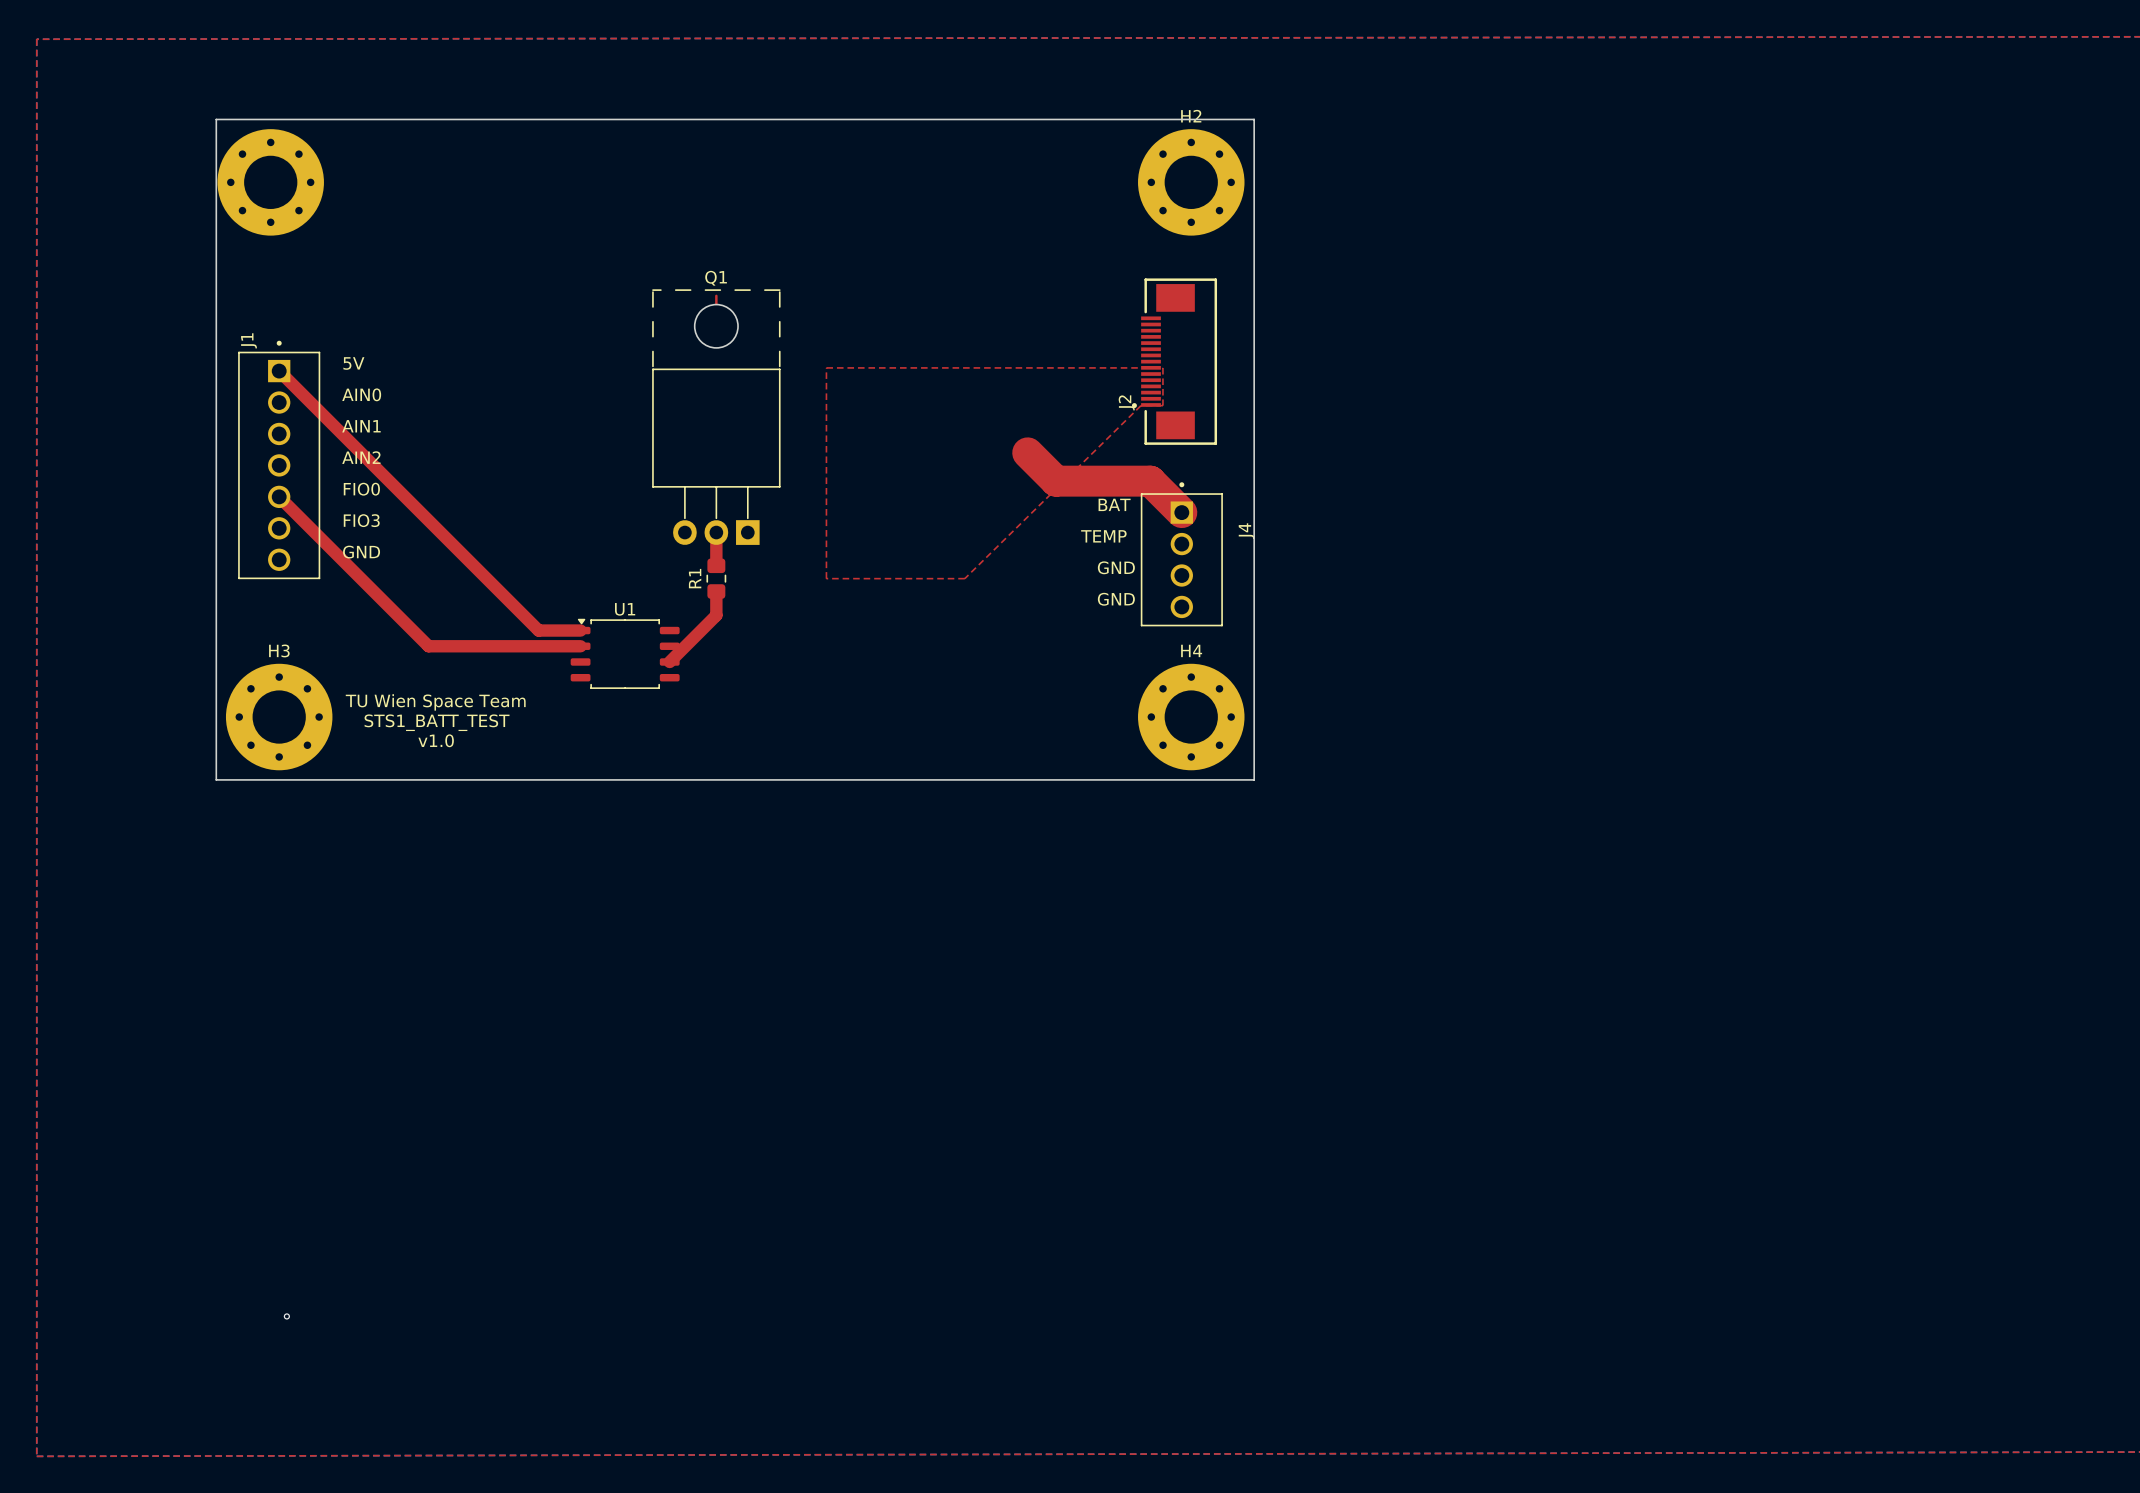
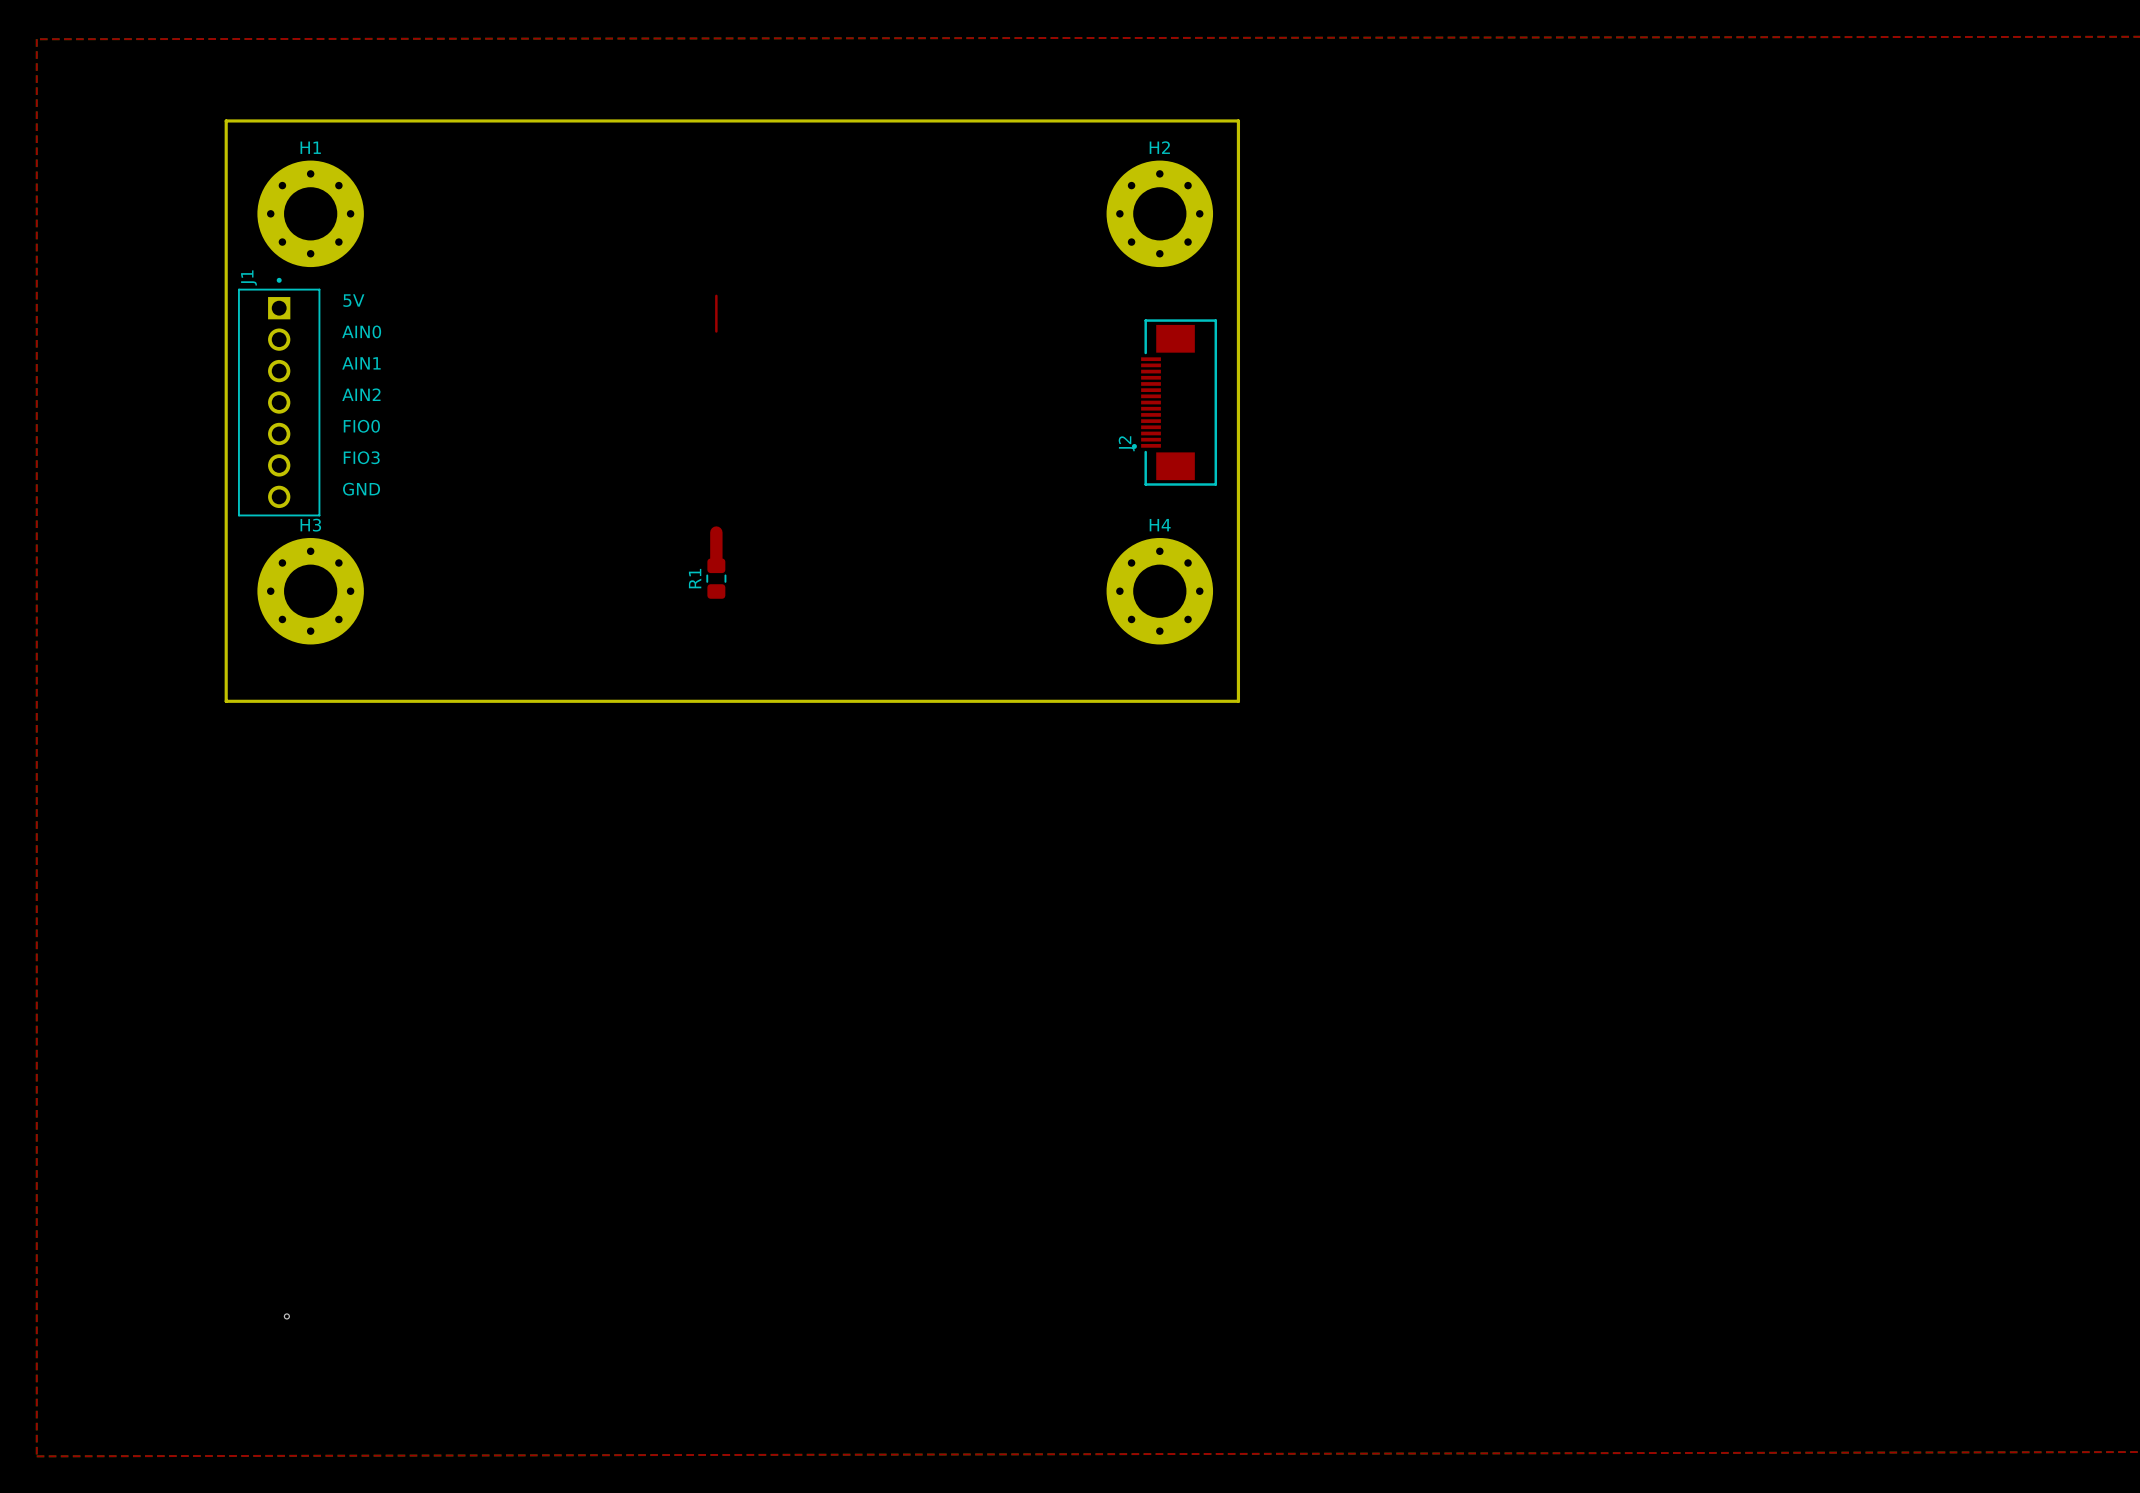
board edge: (216, 119) (1254, 119) (1254, 779) (216, 779) (216, 119) -> (226, 120) (226, 701) (1238, 701) (1238, 120) (226, 120)
part: (270, 182) -> none
H2 position: (1191, 182) -> (1159, 213)
H1: none -> (310, 213)
text: none -> 5V (353, 300)
text: none -> AIN0 (361, 331)
J2 position: (1174, 361) -> (1174, 402)
text: 5V (353, 363) -> AIN1 (361, 363)
top zone outline: (826, 367) (826, 578) (964, 578) (1140, 405) (1162, 405) (1162, 367) (826, 367) -> none
top track: (279, 371) (538, 630) (580, 630) -> none
text: AIN0 (361, 394) -> AIN2 (361, 394)
Q1: (716, 417) -> none
text: AIN1 (361, 426) -> FIO0 (361, 426)
top track: (1027, 452) (1056, 481) (1150, 481) (1181, 512) -> none
text: AIN2 (361, 457) -> FIO3 (361, 457)
J1 position: (279, 459) -> (279, 397)
text: FIO0 (361, 489) -> GND (361, 489)
top track: (279, 496) (428, 646) (580, 646) -> none
text: BAT (1114, 504) -> none
text: FIO3 (361, 520) -> none
text: TEMP (1103, 536) -> none
text: GND (361, 552) -> none
J4: (1181, 554) -> none
text: GND (1116, 567) -> none
top track: (716, 591) (716, 615) (669, 661) -> none
text: GND (1116, 599) -> none
U1: (625, 653) -> none
text: TU Wien Space Team (435, 702) -> none
H3 position: (279, 717) -> (310, 591)
H4 position: (1191, 717) -> (1159, 591)
text: STS1_BATT_TEST (437, 722) -> none
text: v1.0 (436, 740) -> none

